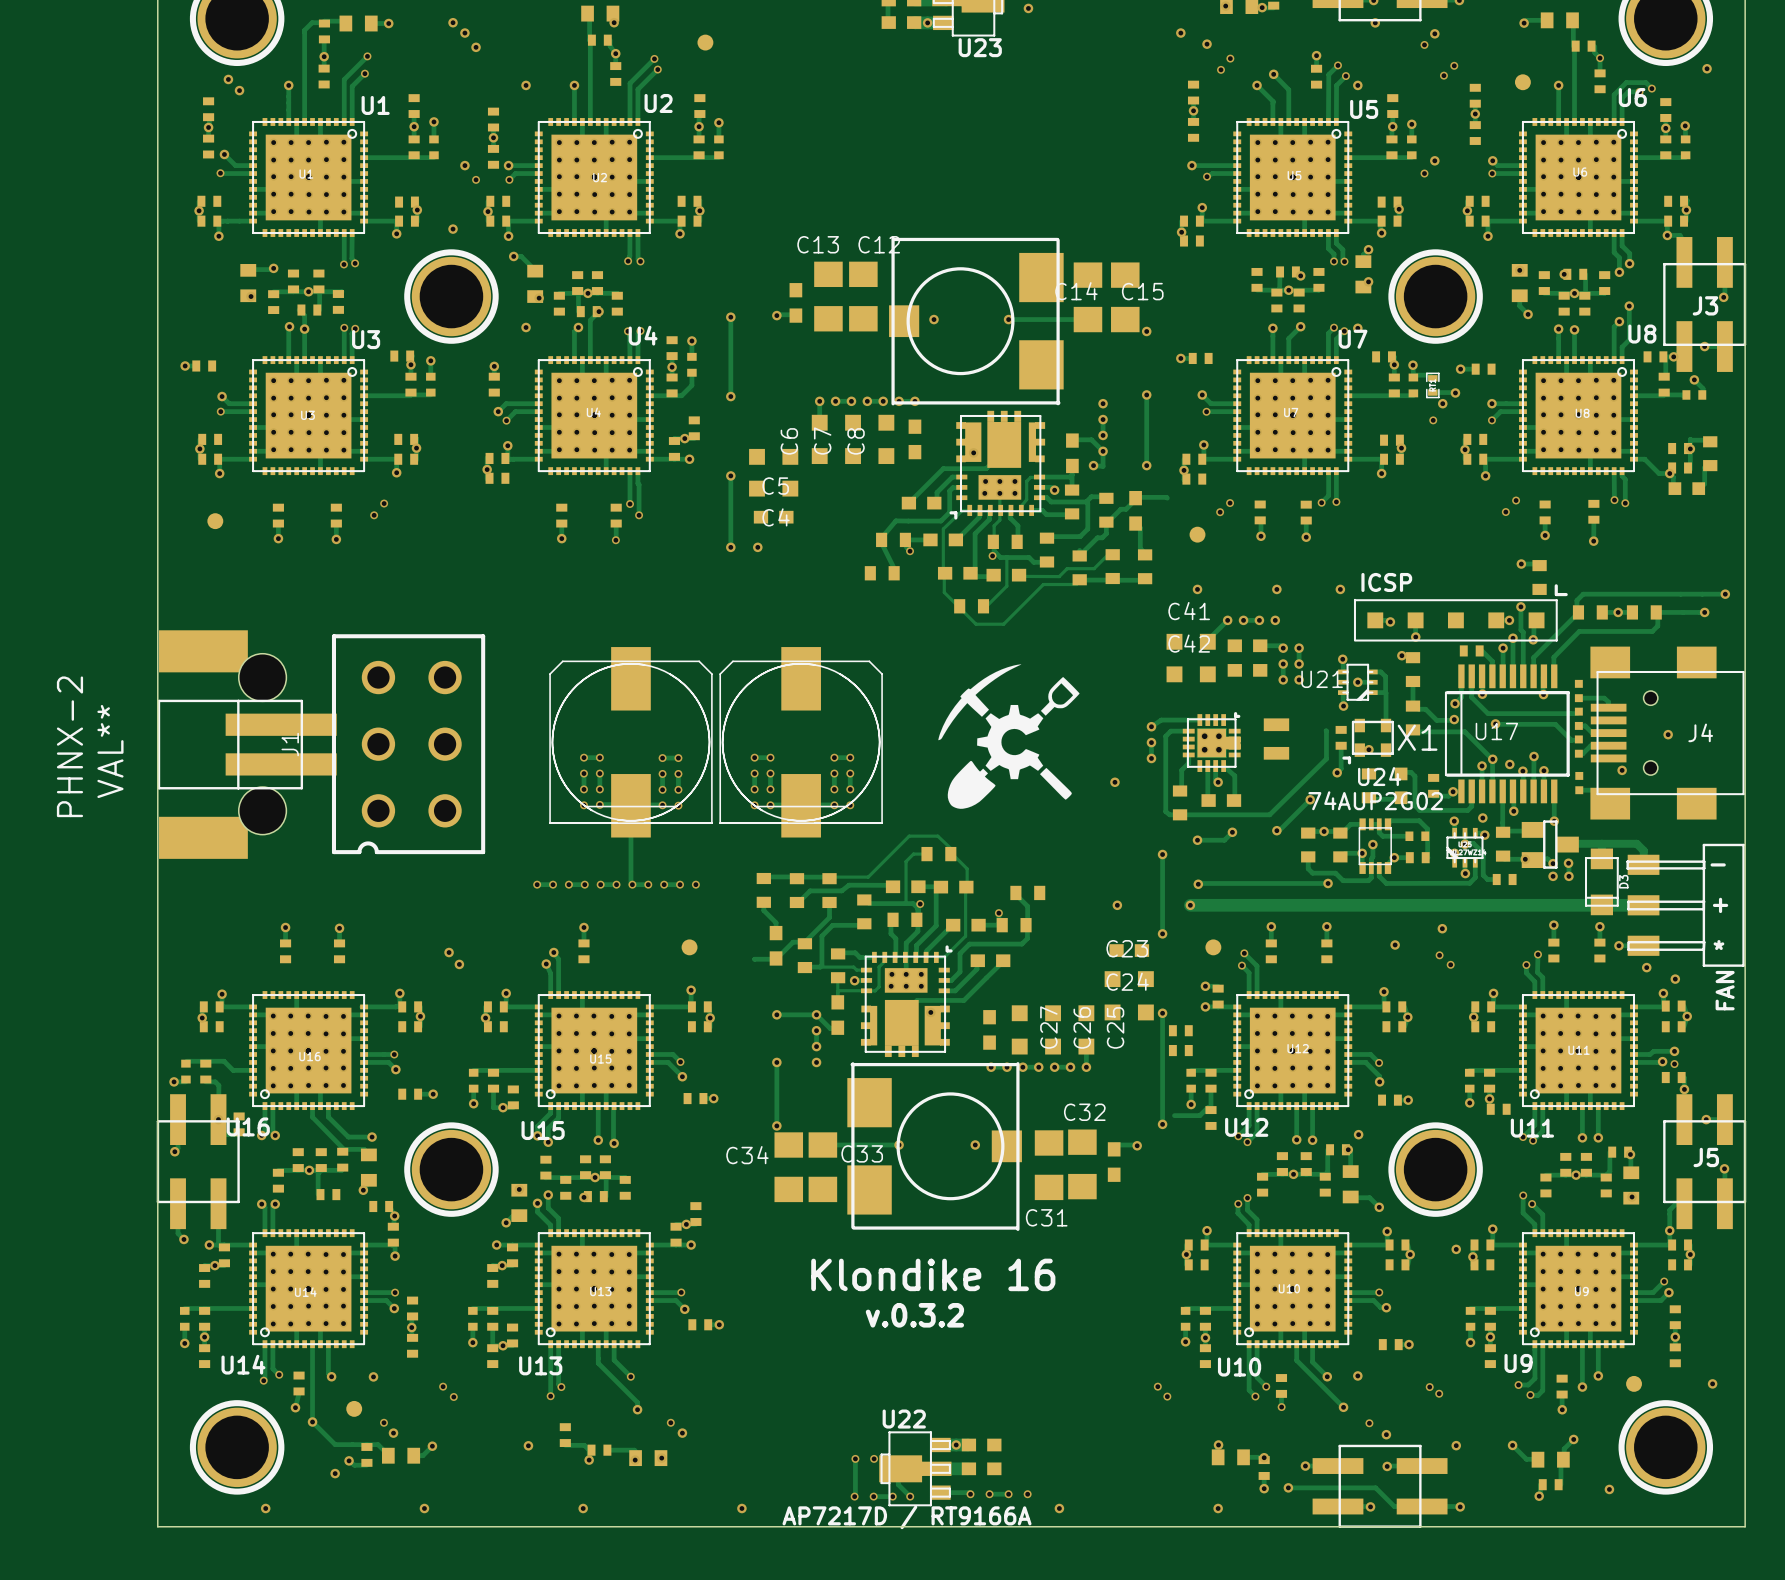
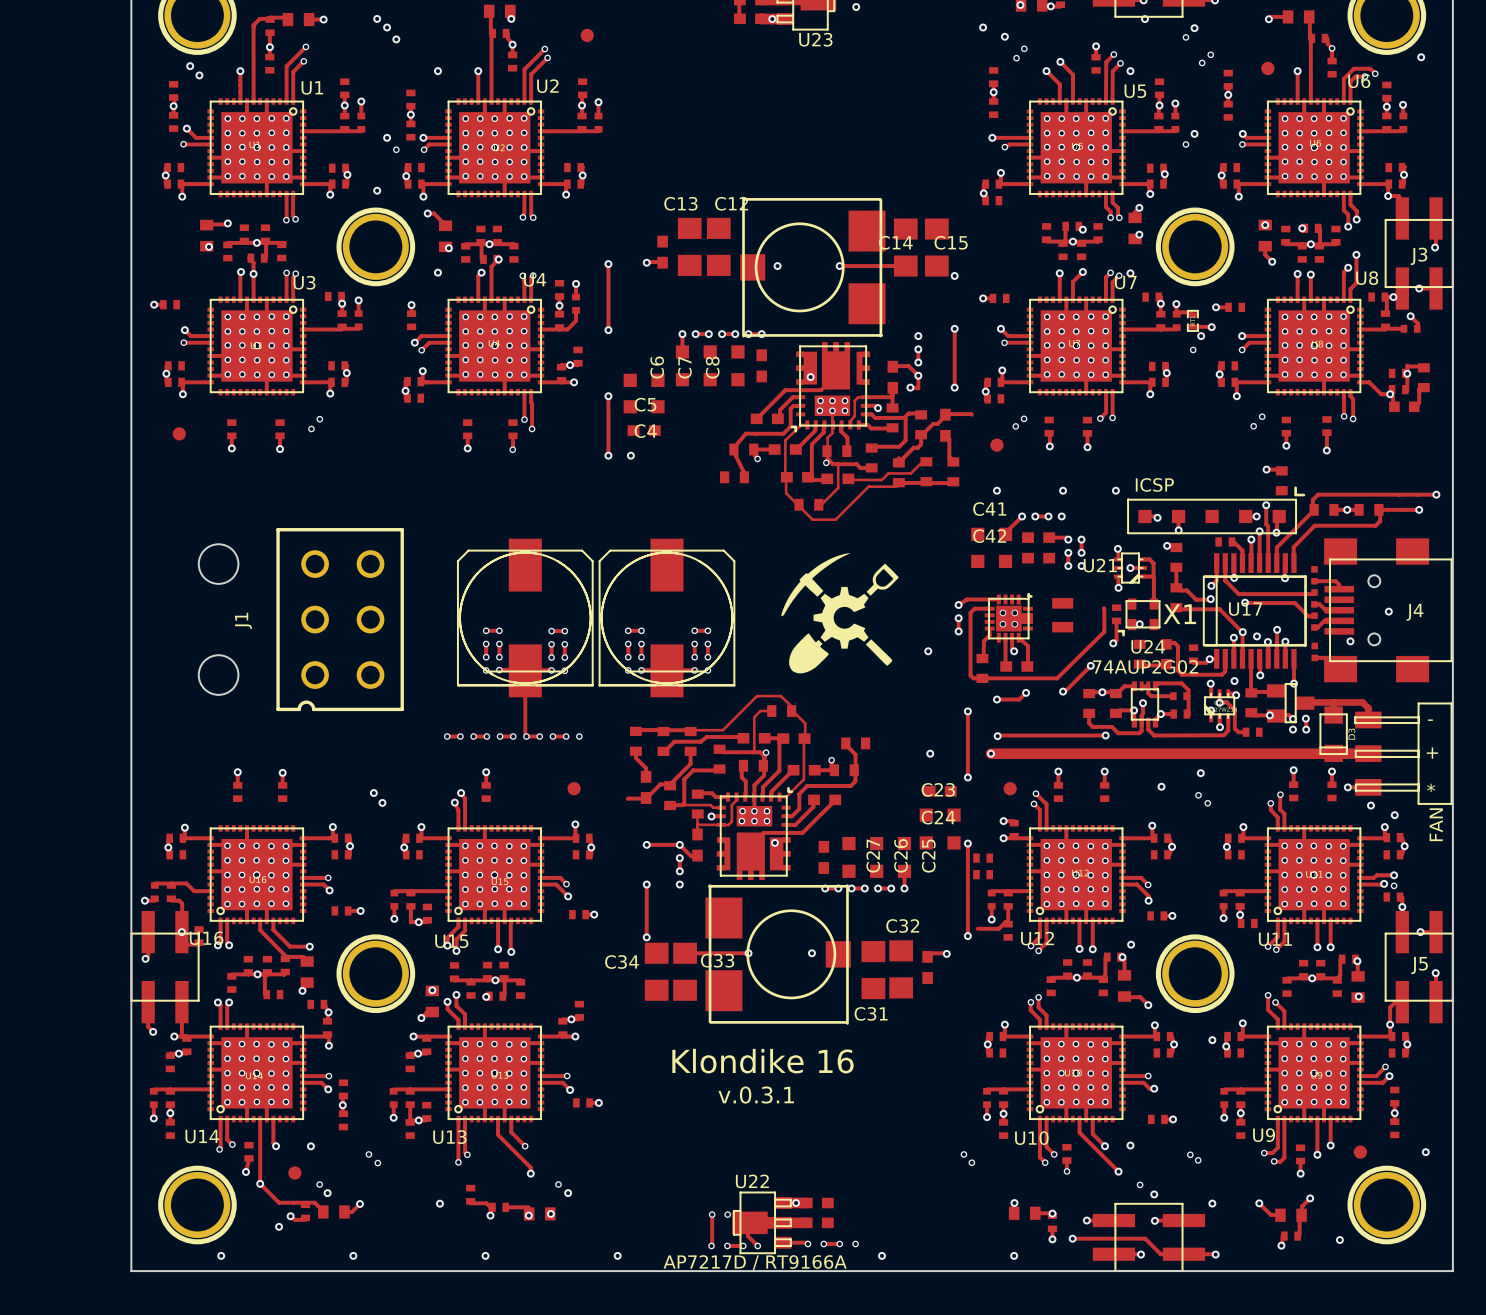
PHNX-2: VAL** (247, 744) -> none
text: v.0.3.2 (914, 1315) -> v.0.3.1 (756, 1095)

